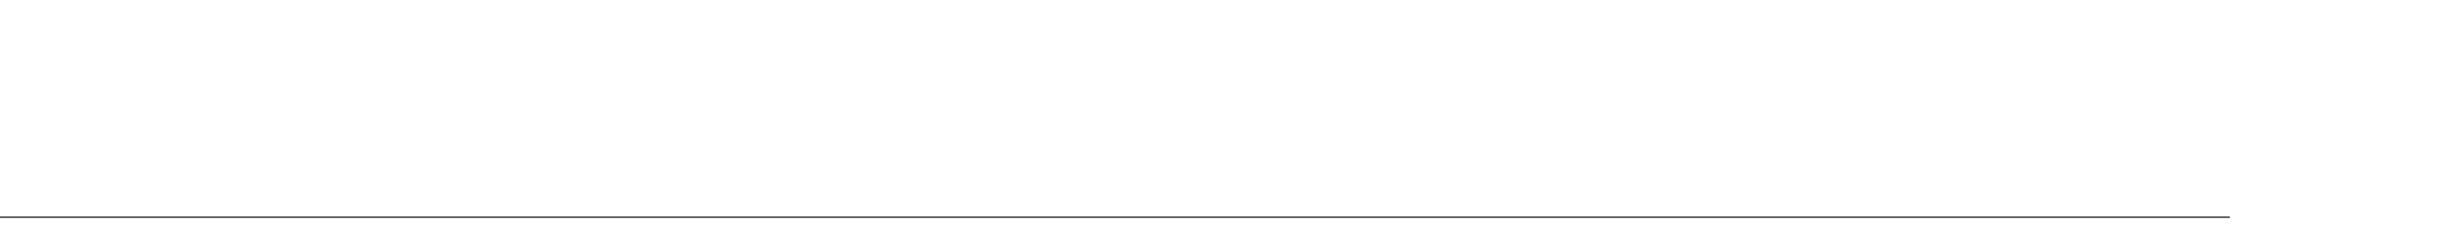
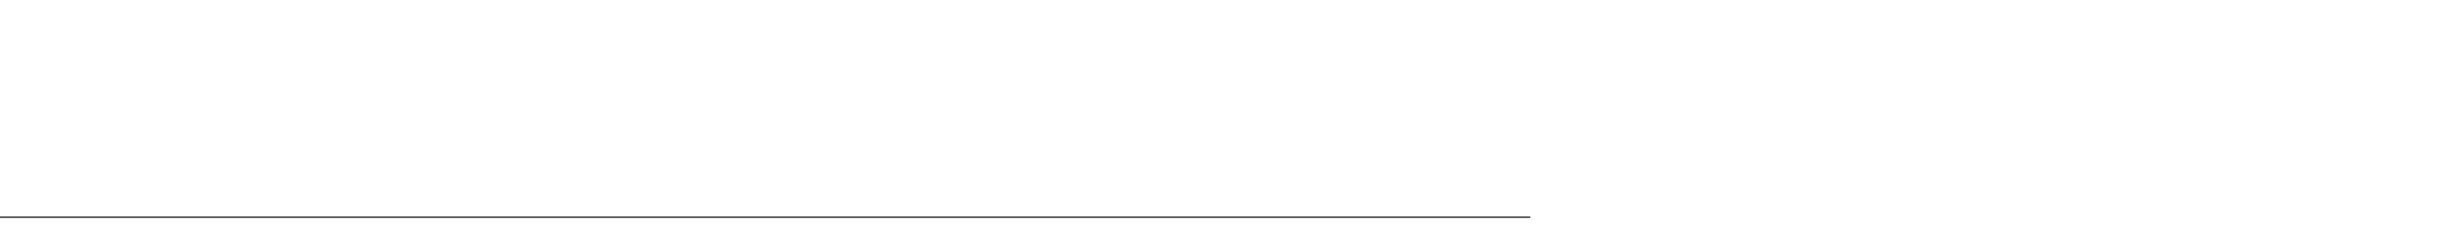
line: (1529, 217) (2229, 217) -> none

